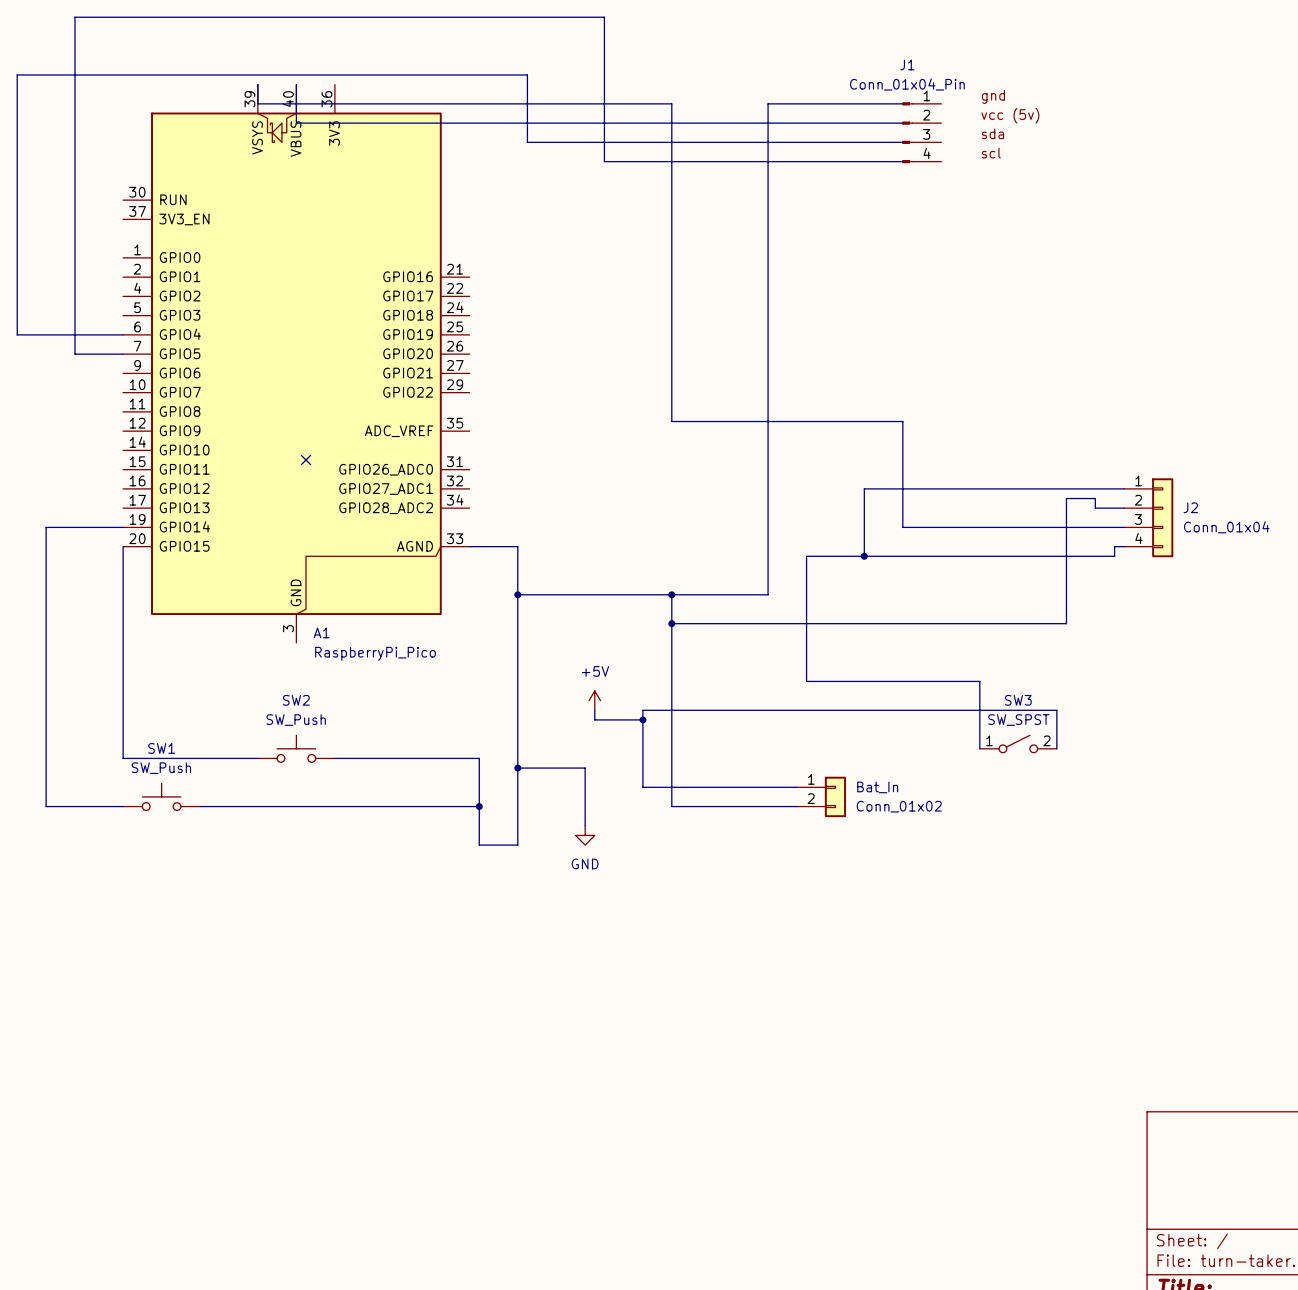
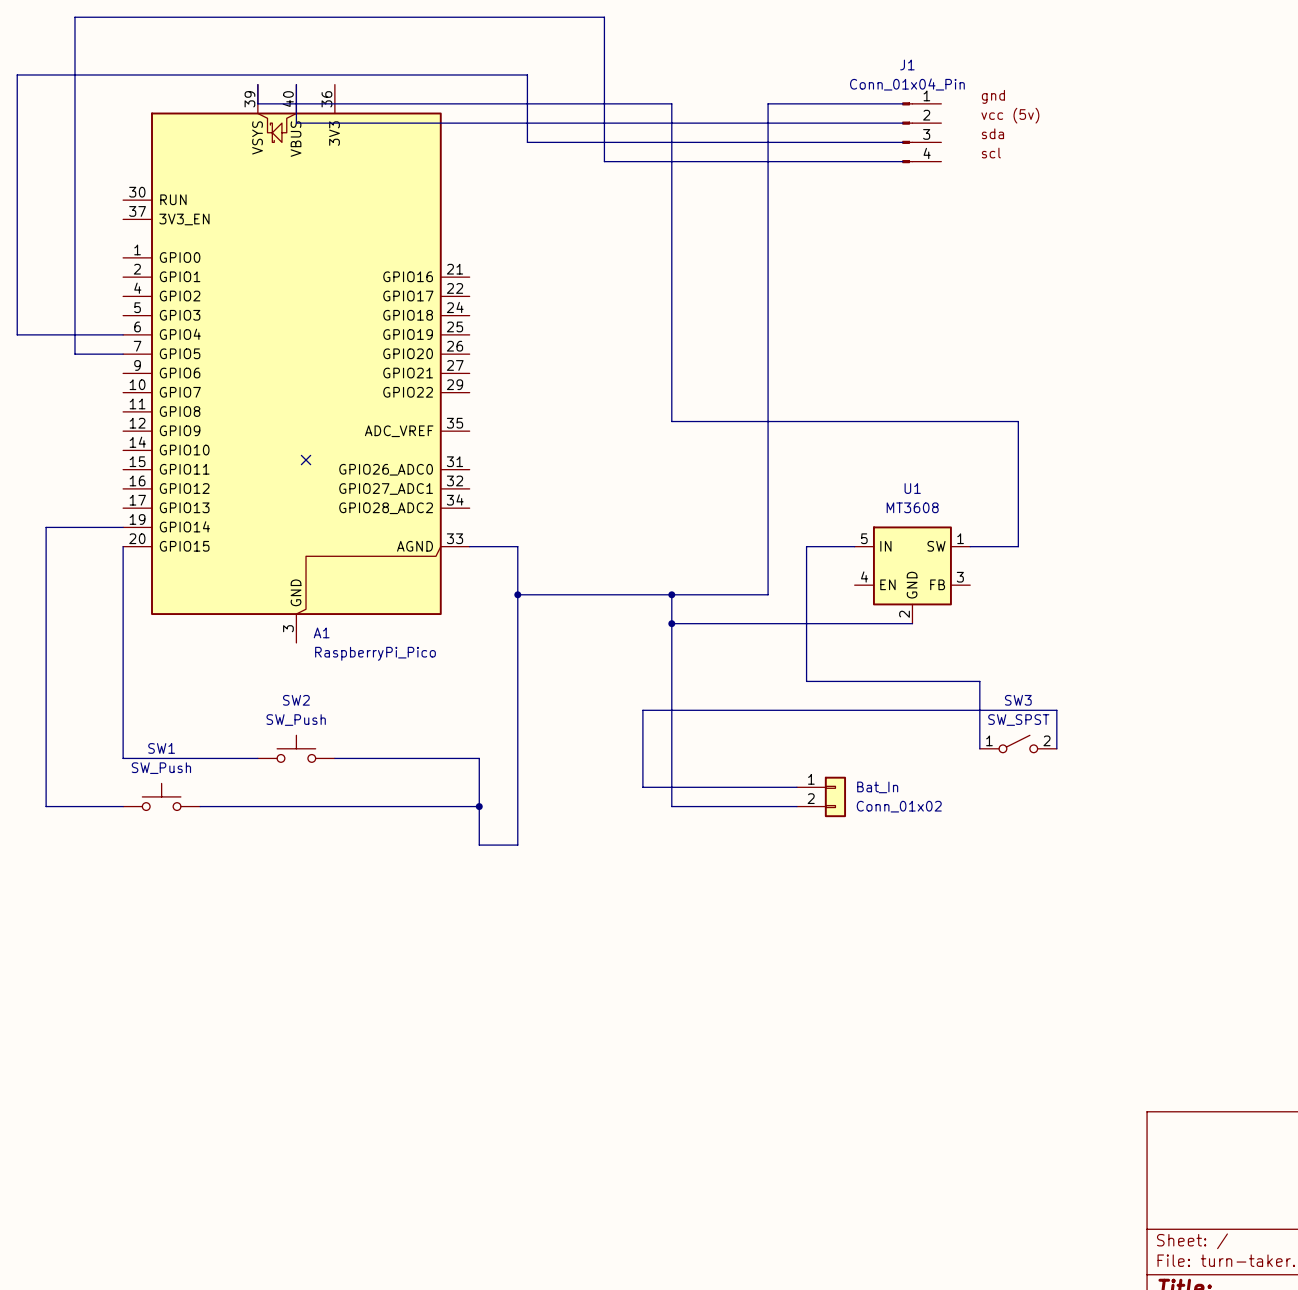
wire: (902, 421) (902, 527) (1124, 527) -> (902, 421) (1018, 421) (1018, 546) (970, 546)
wire: (1124, 488) (864, 488) (864, 556) -> none
wire: (1124, 508) (1095, 508) (1095, 498) (1066, 498) (1066, 623) (912, 623) -> none
J2: Conn_01x04 (1148, 517) -> none
wire: (1124, 546) (1114, 546) (1114, 556) (806, 556) -> (854, 546) (806, 546) (806, 556)
junction: (864, 556) -> none
U1: none -> MT3608 (912, 575)
power symbol: +5V (594, 700) -> none
wire: (594, 710) (594, 719) (642, 719) -> none
junction: (642, 719) -> none
wire: (517, 768) (585, 768) (585, 825) -> none
junction: (517, 768) -> none
power symbol: GND (585, 835) -> none

